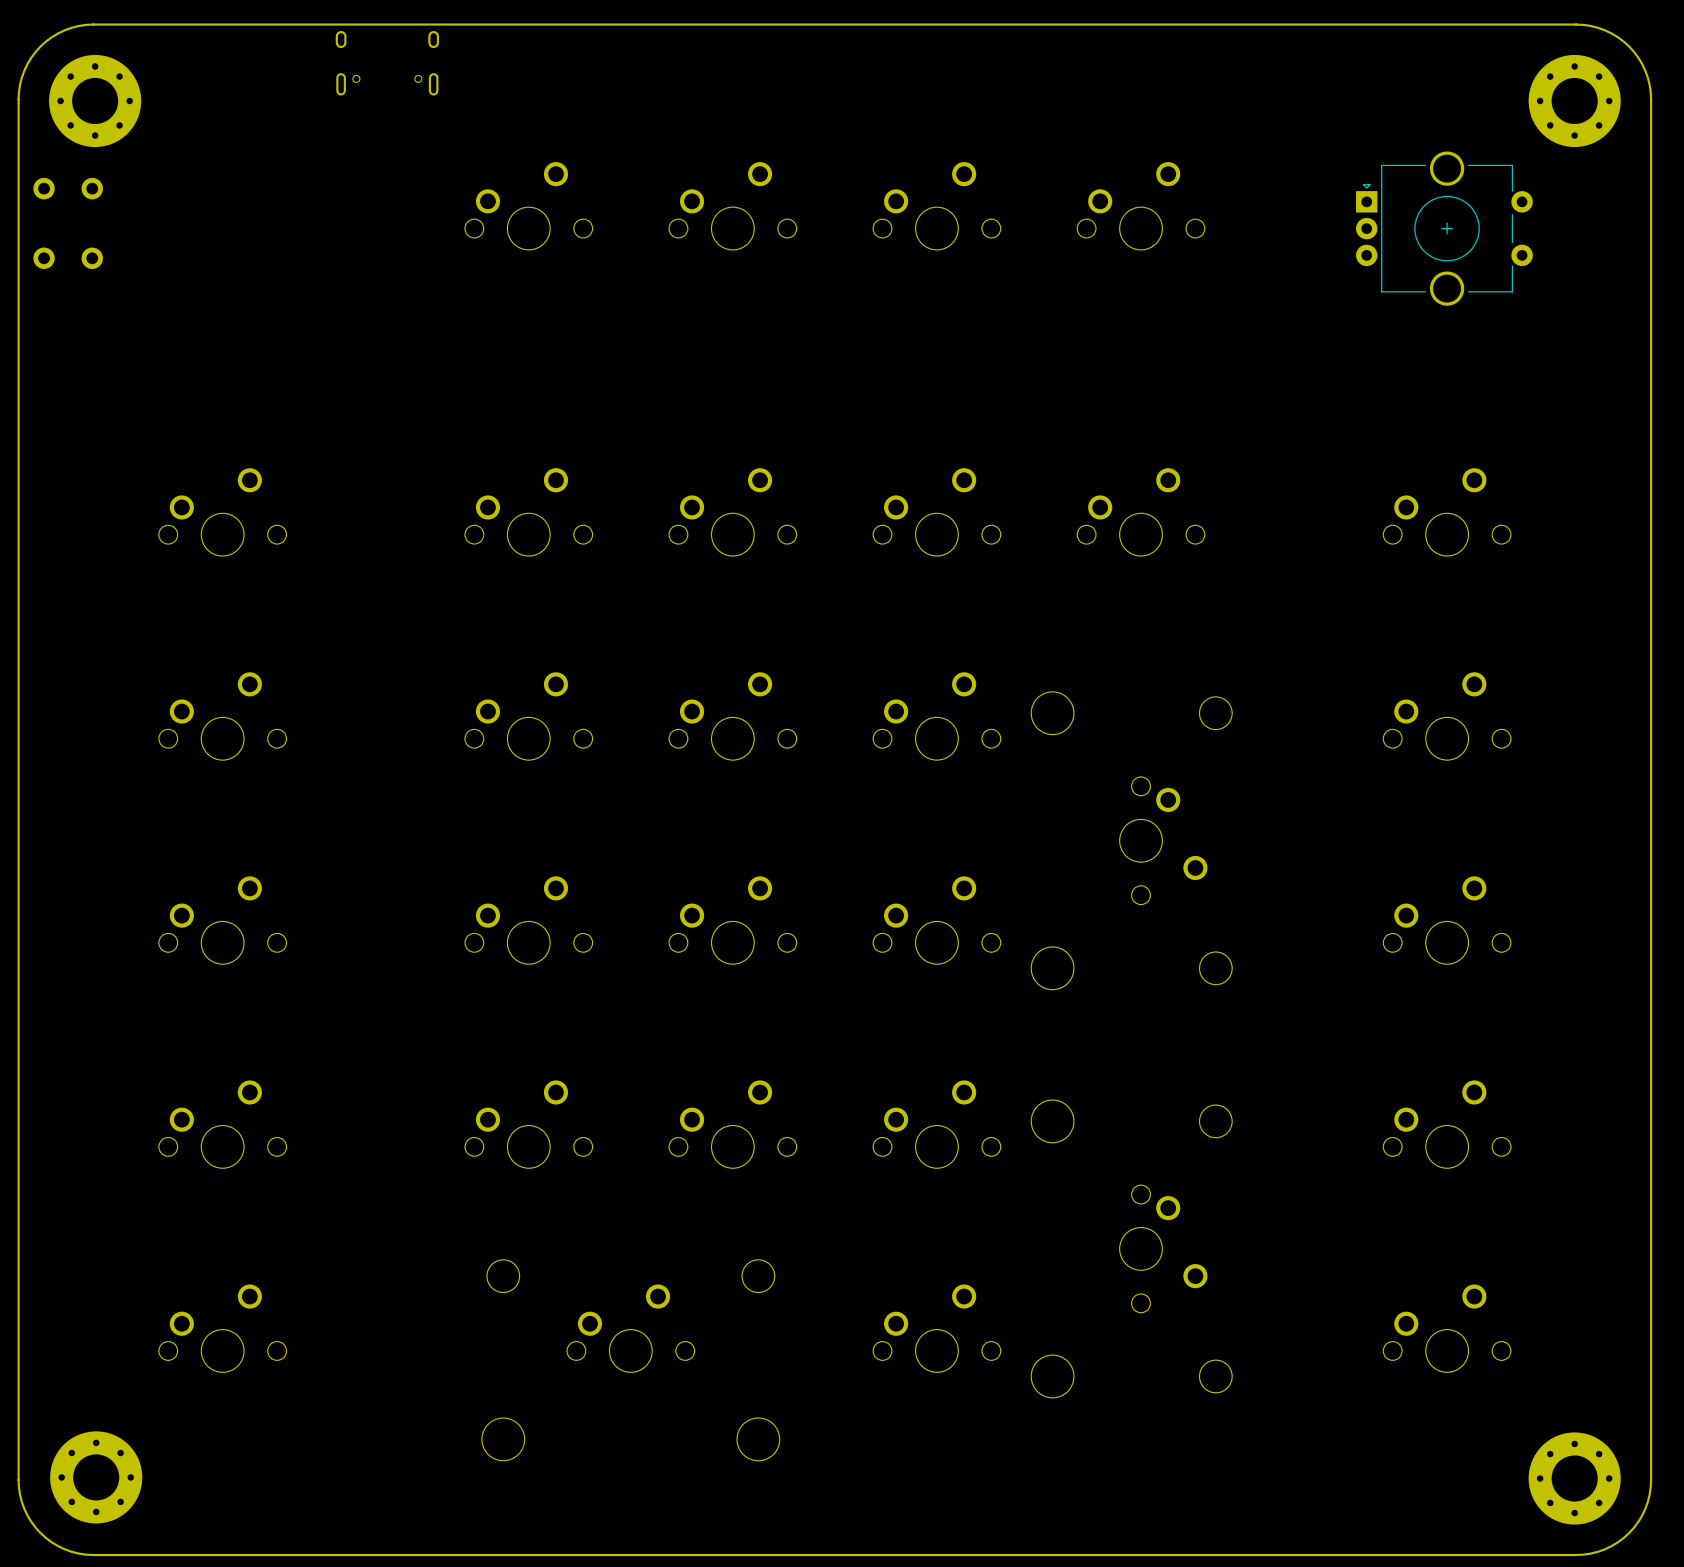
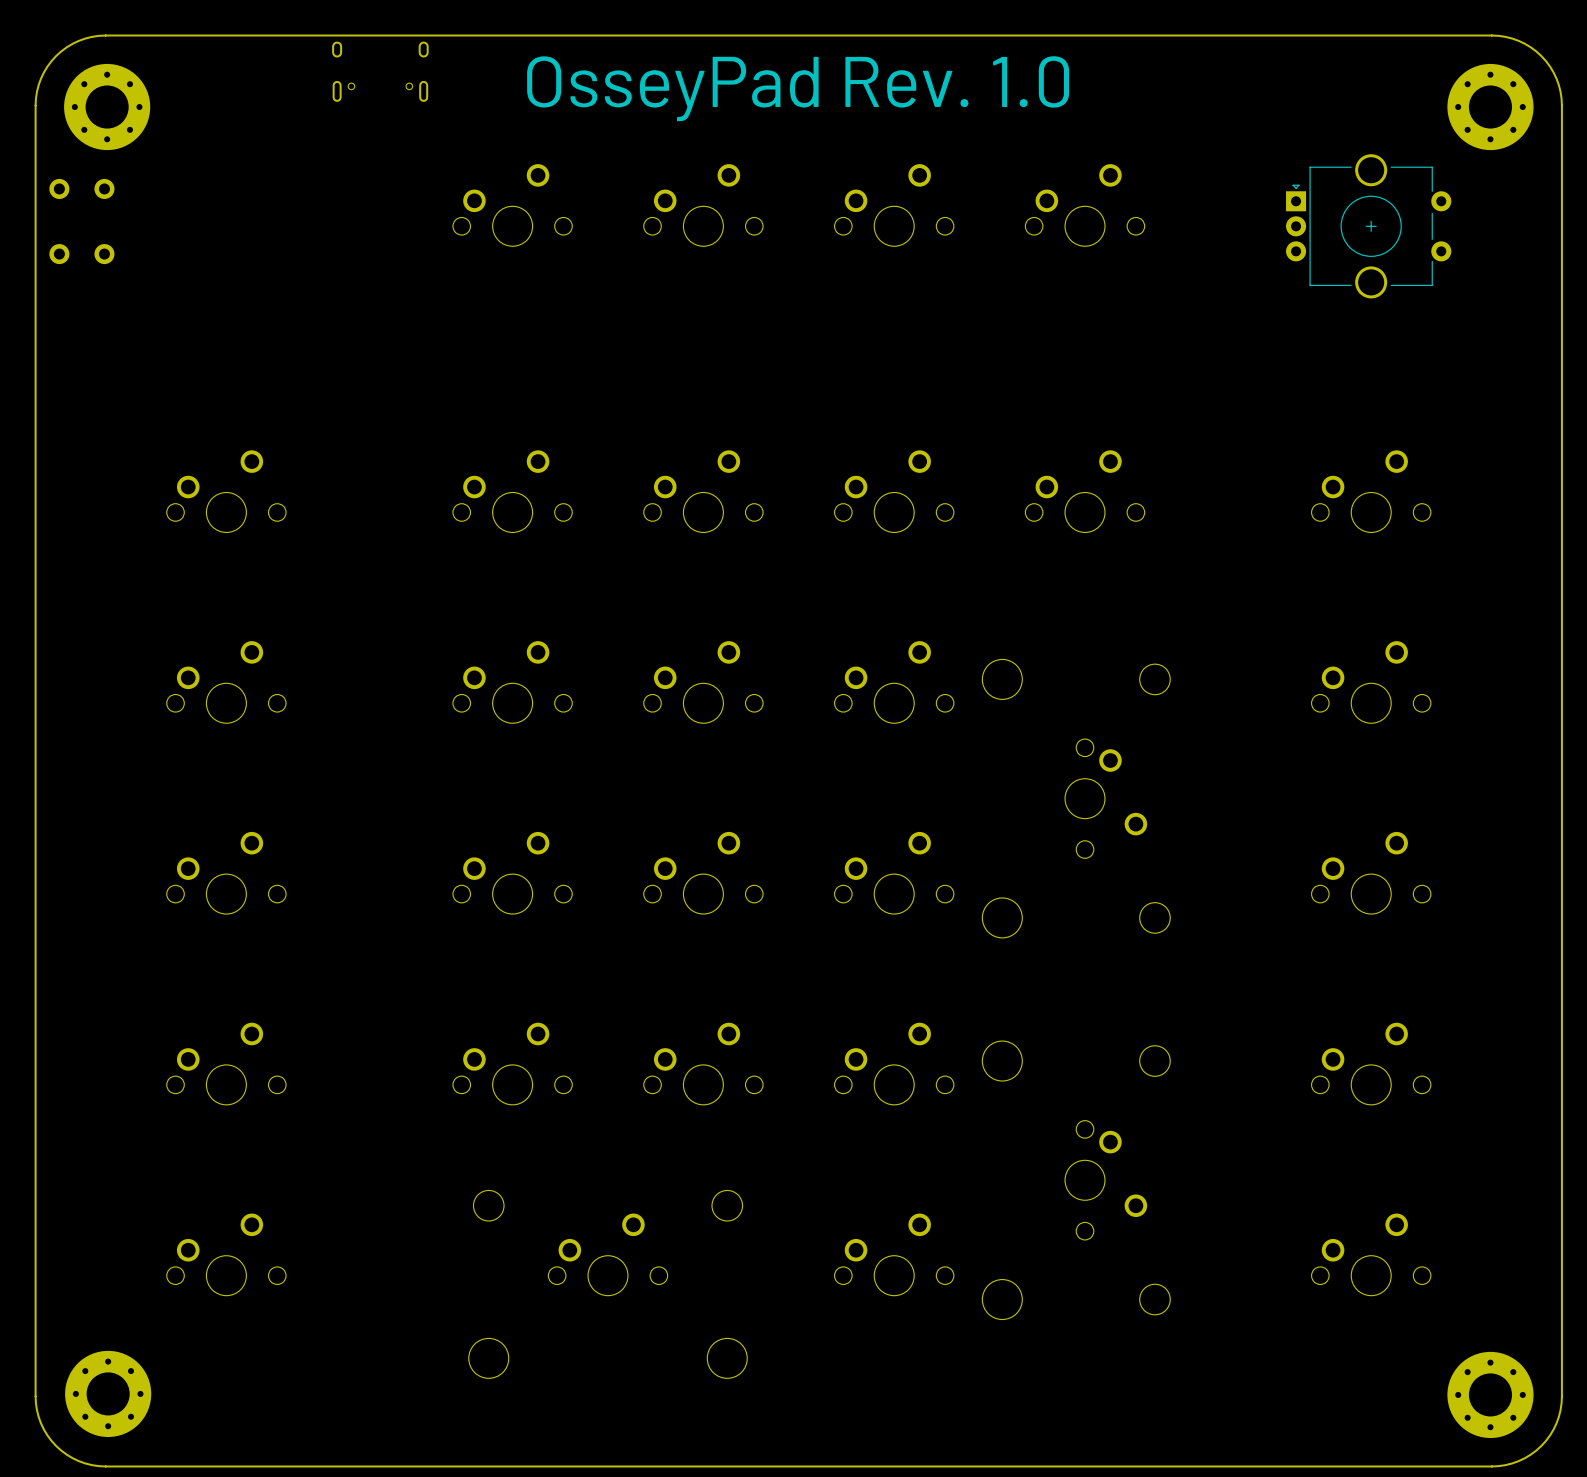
text: none -> OsseyPad Rev. 1.0 (798, 88)

